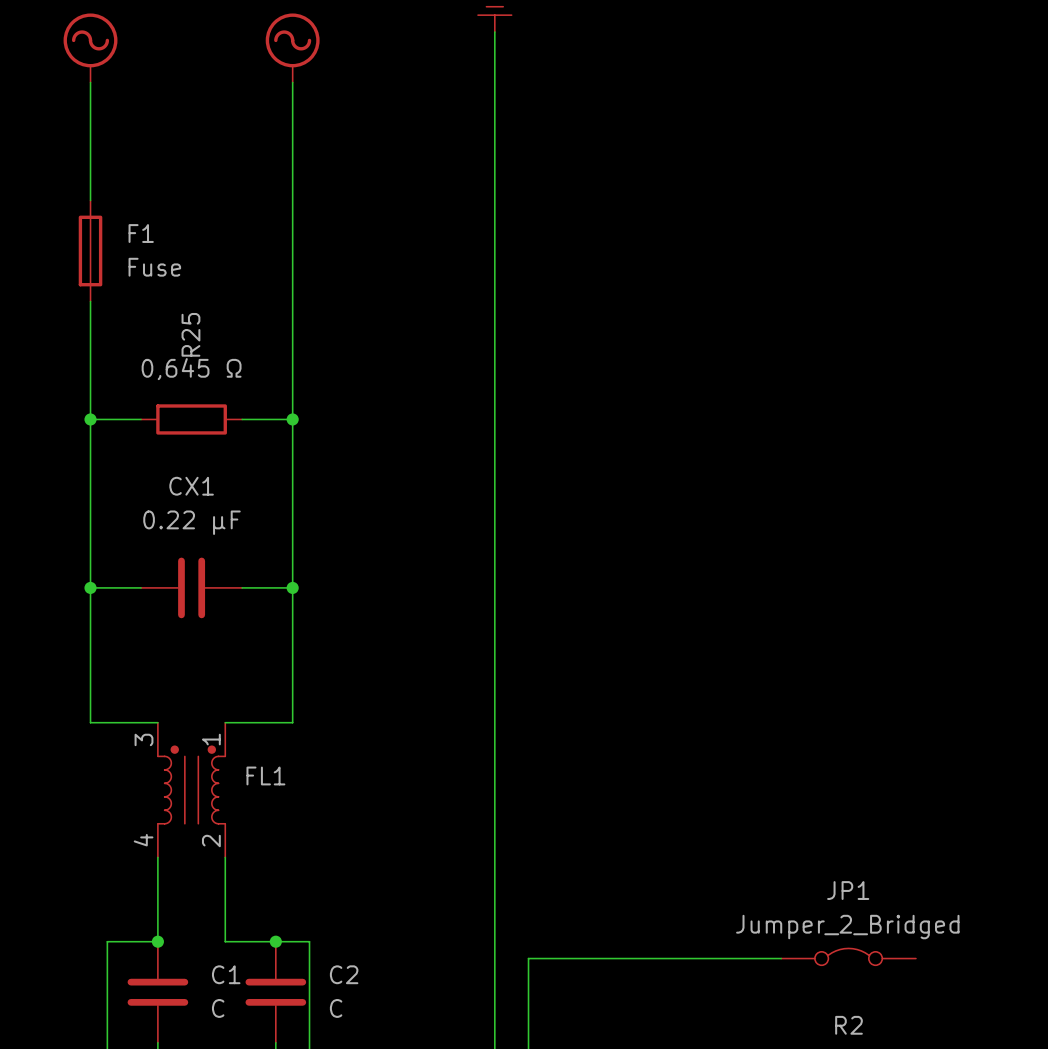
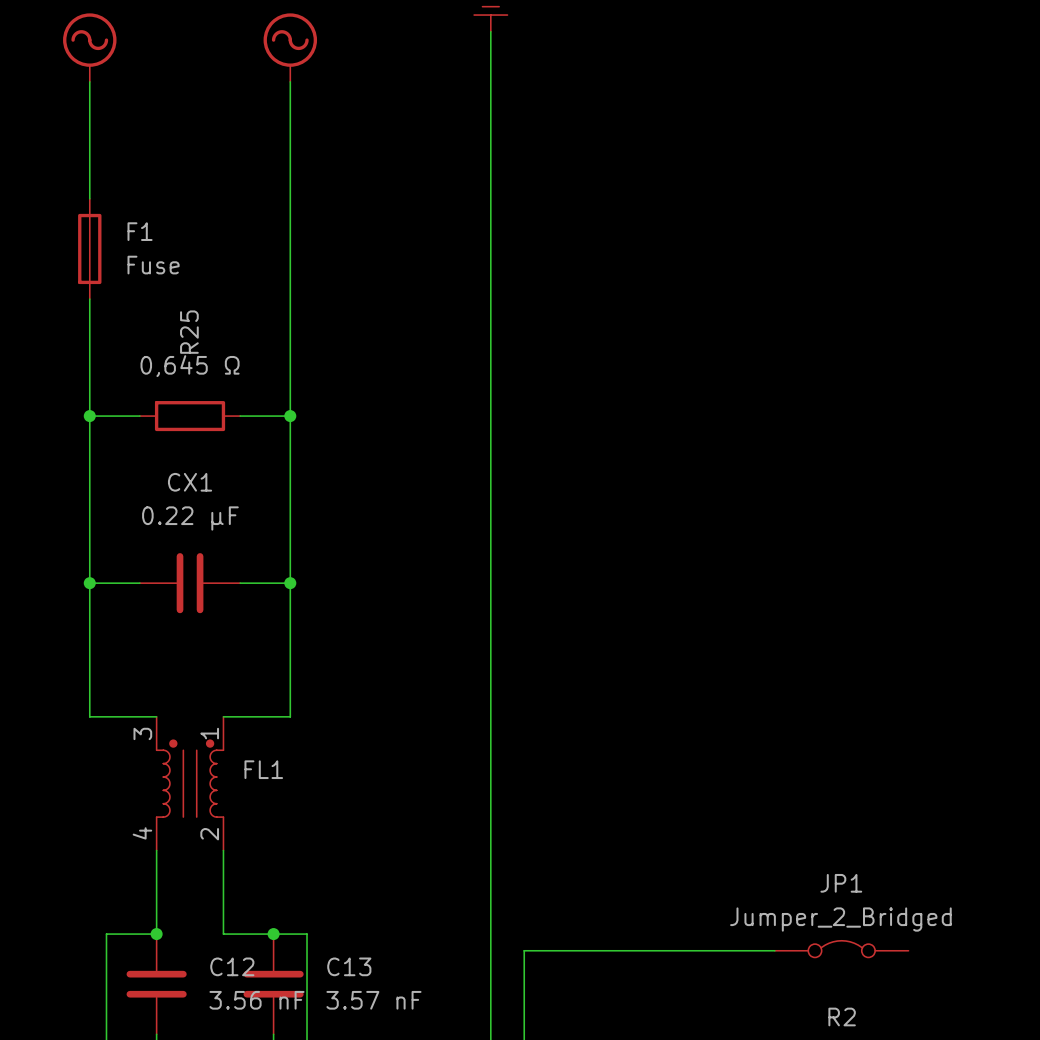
C1 name: C1 (226, 974) -> C12 (232, 966)
C2 name: C2 (344, 974) -> C13 (349, 966)
C1 value: C (218, 1008) -> 3.56 nF (257, 1000)
C2 value: C (336, 1008) -> 3.57 nF (373, 1000)

